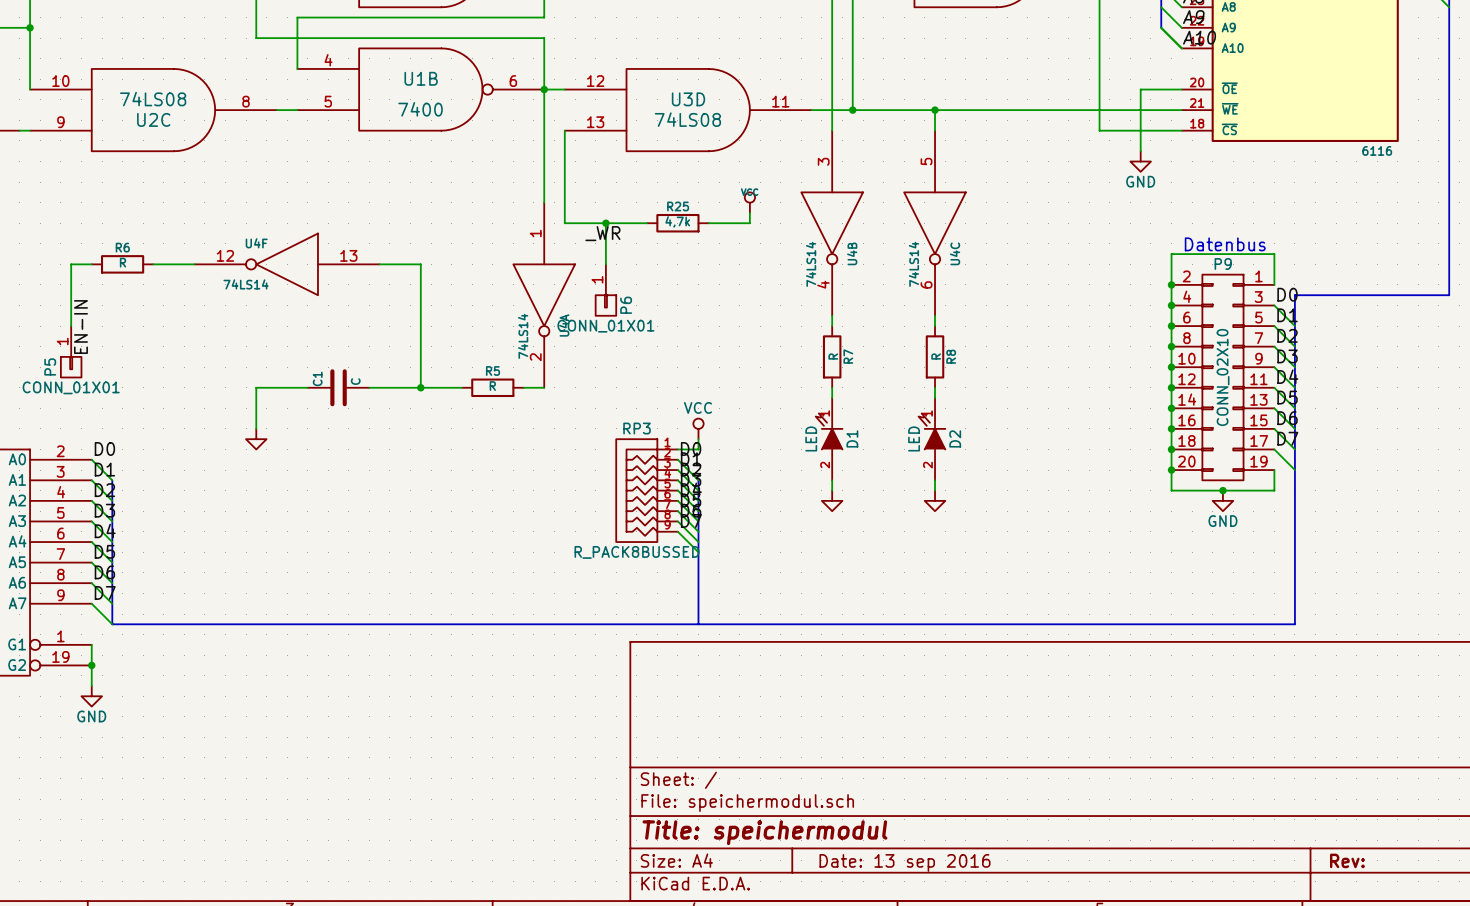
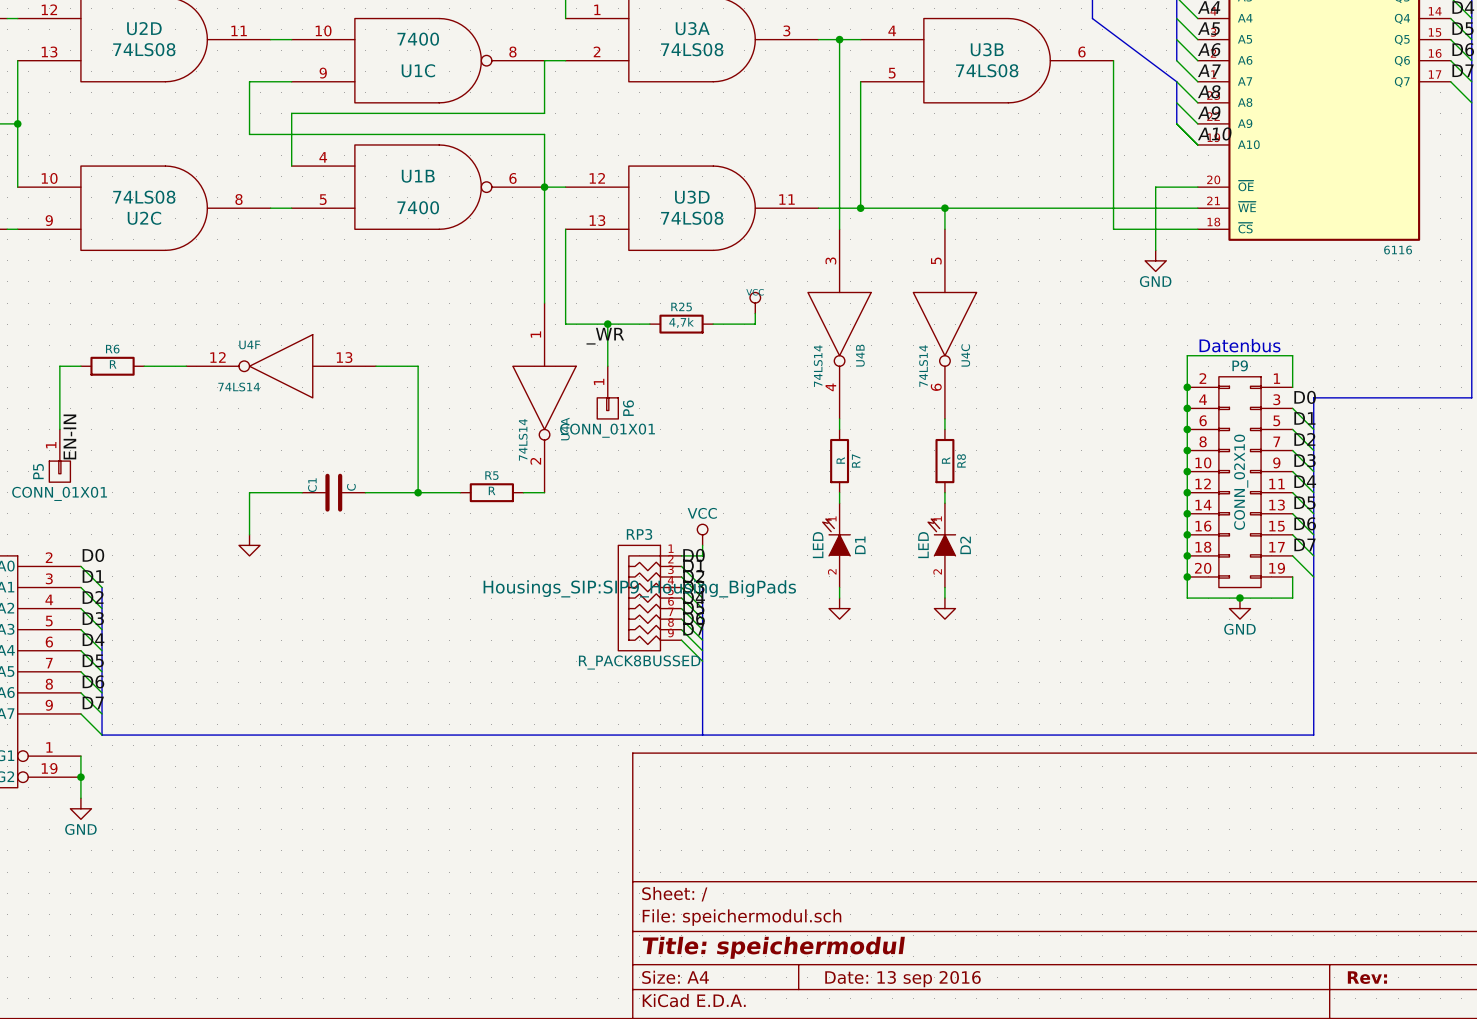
RP3 text: none -> Housings_SIP:SIP9_Housing_BigPads (639, 588)

